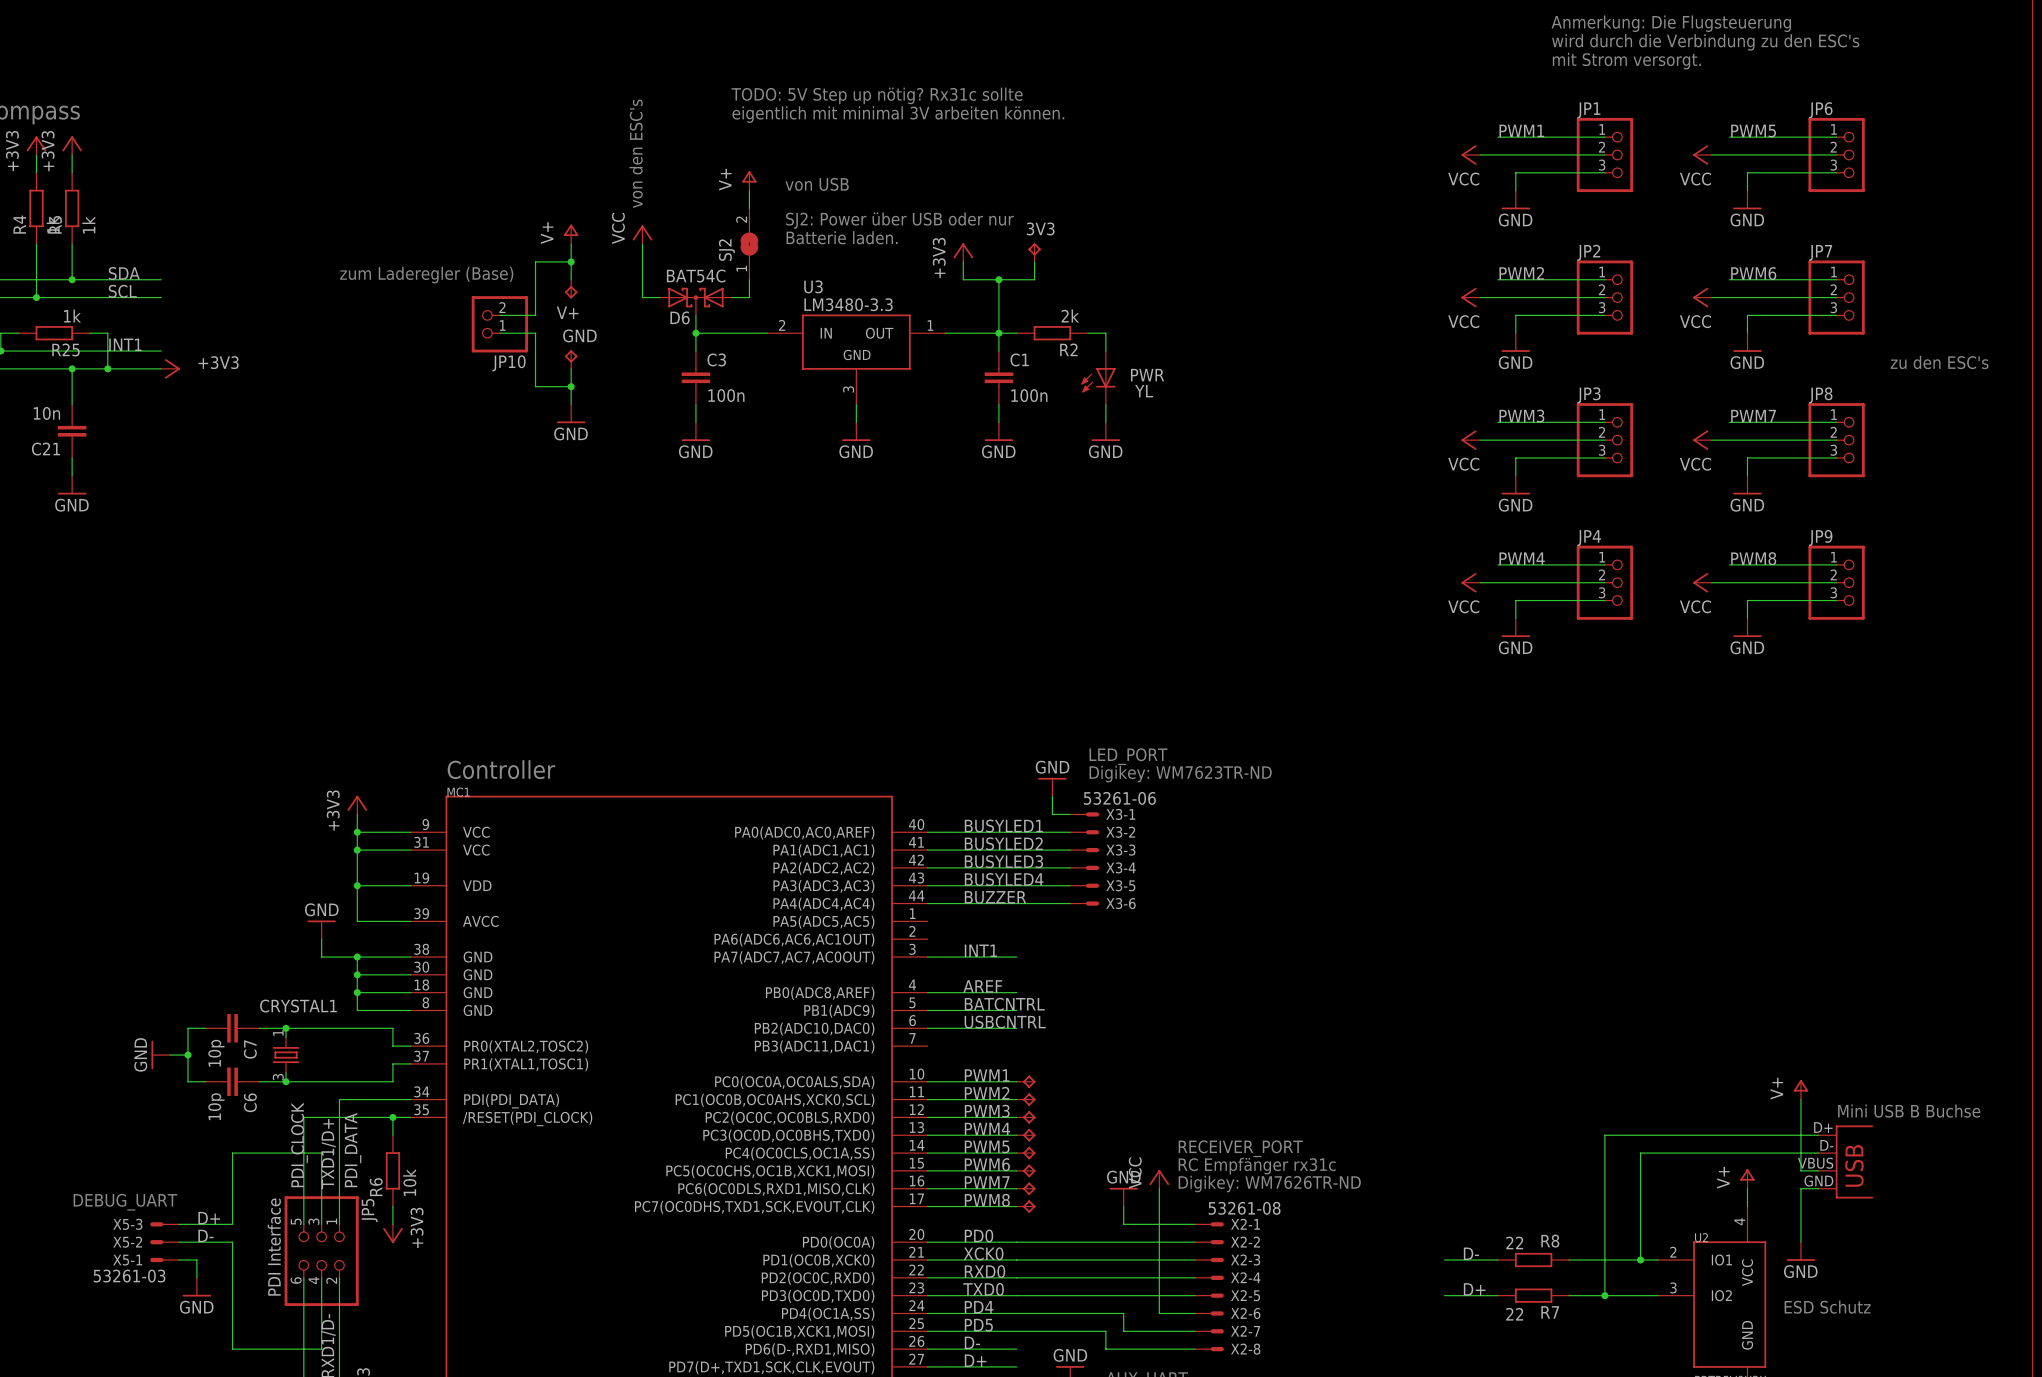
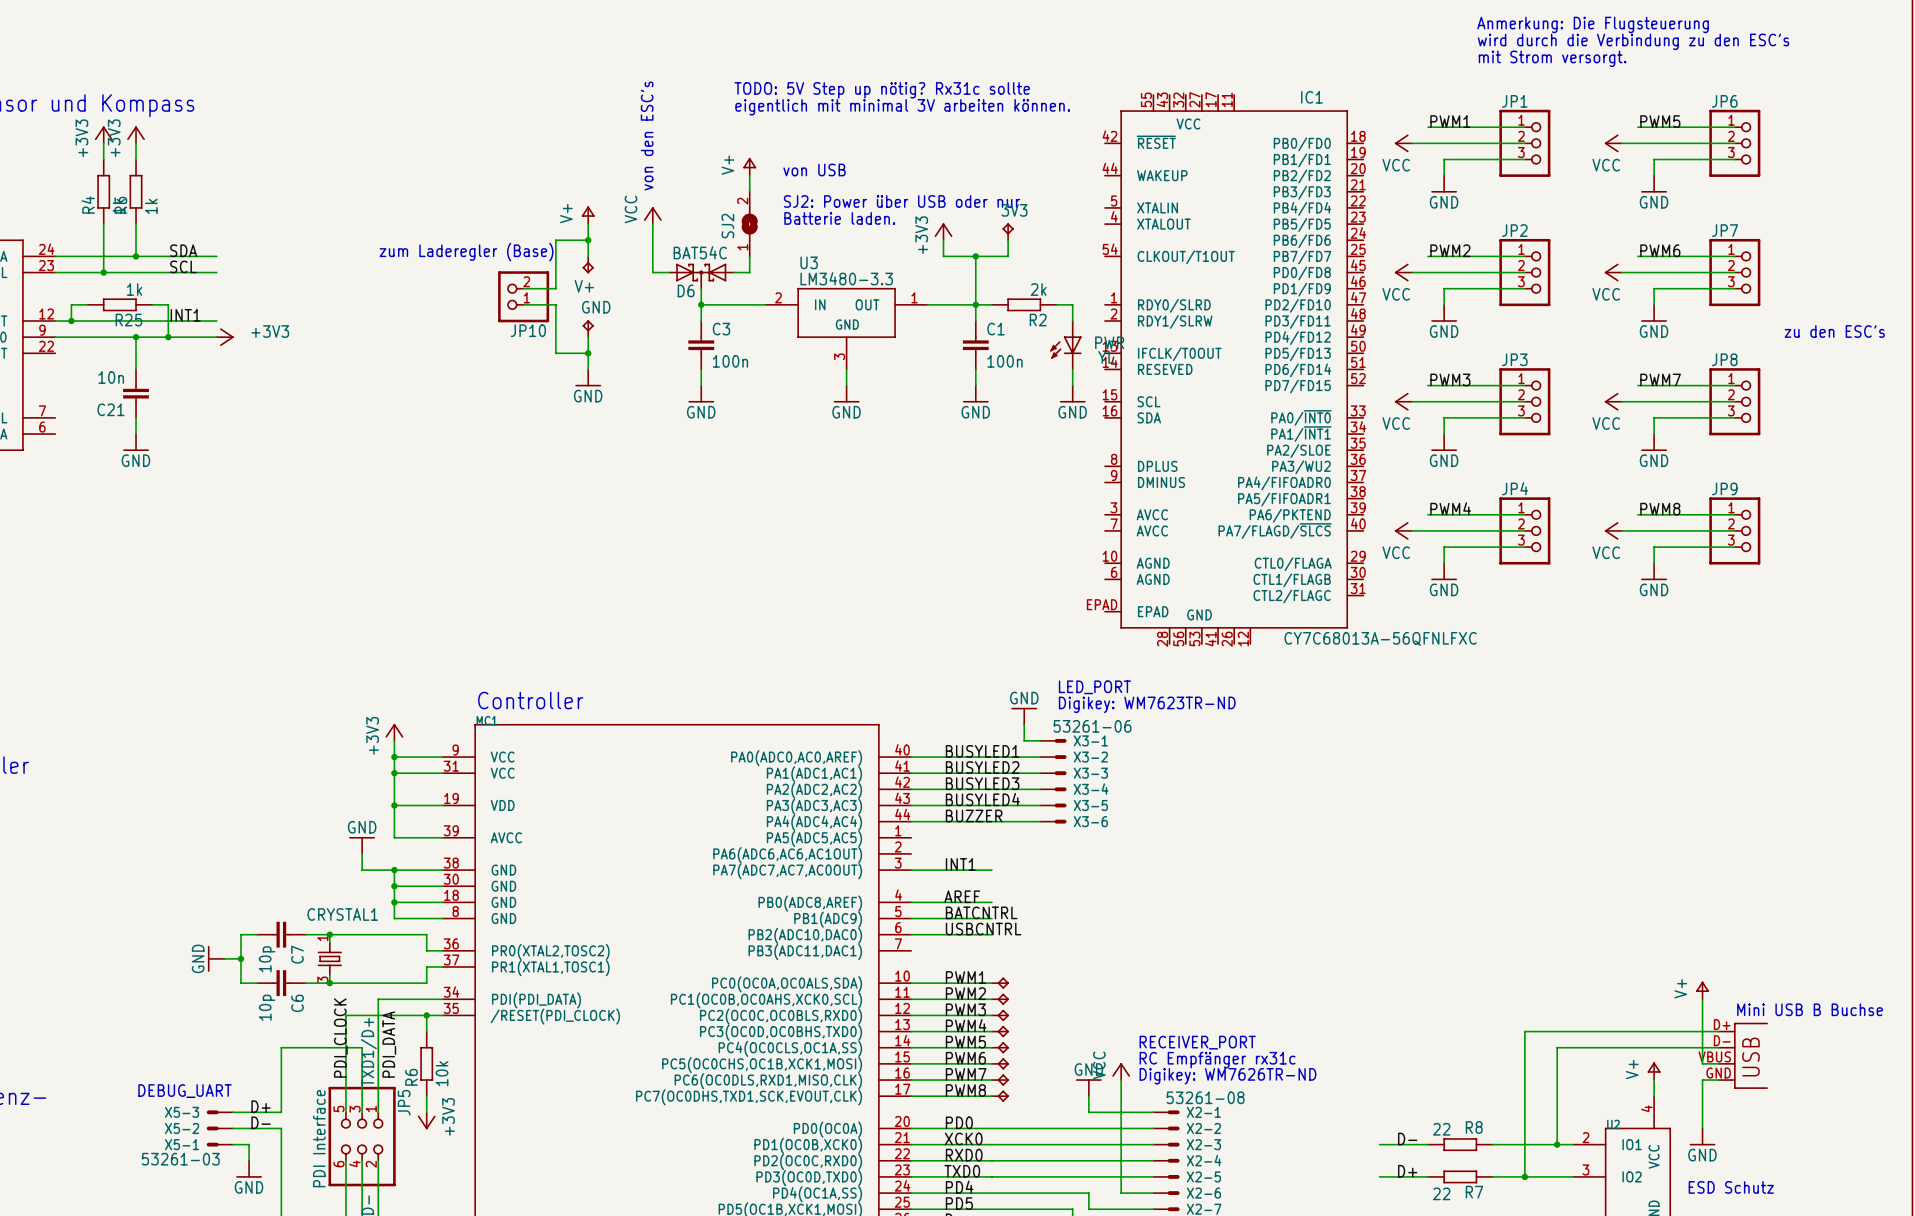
IC1: none -> CY7C68013A-56QFNLFXC (1234, 369)

